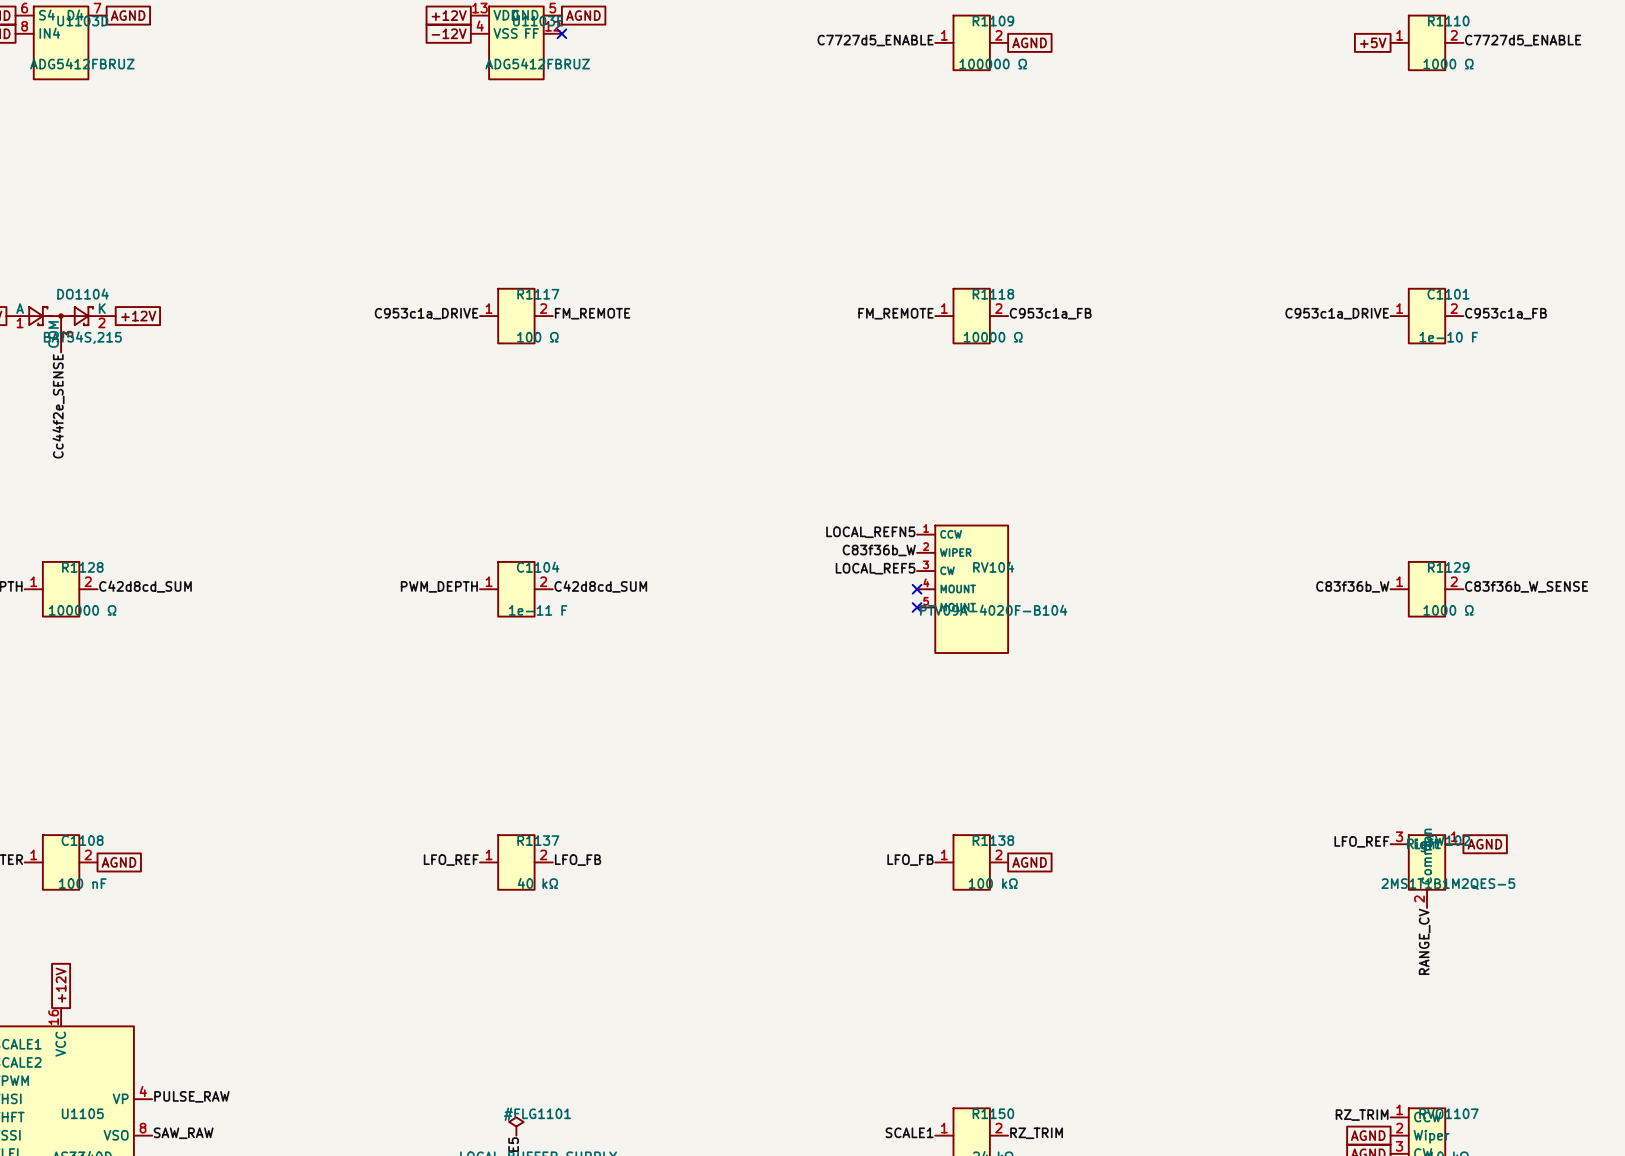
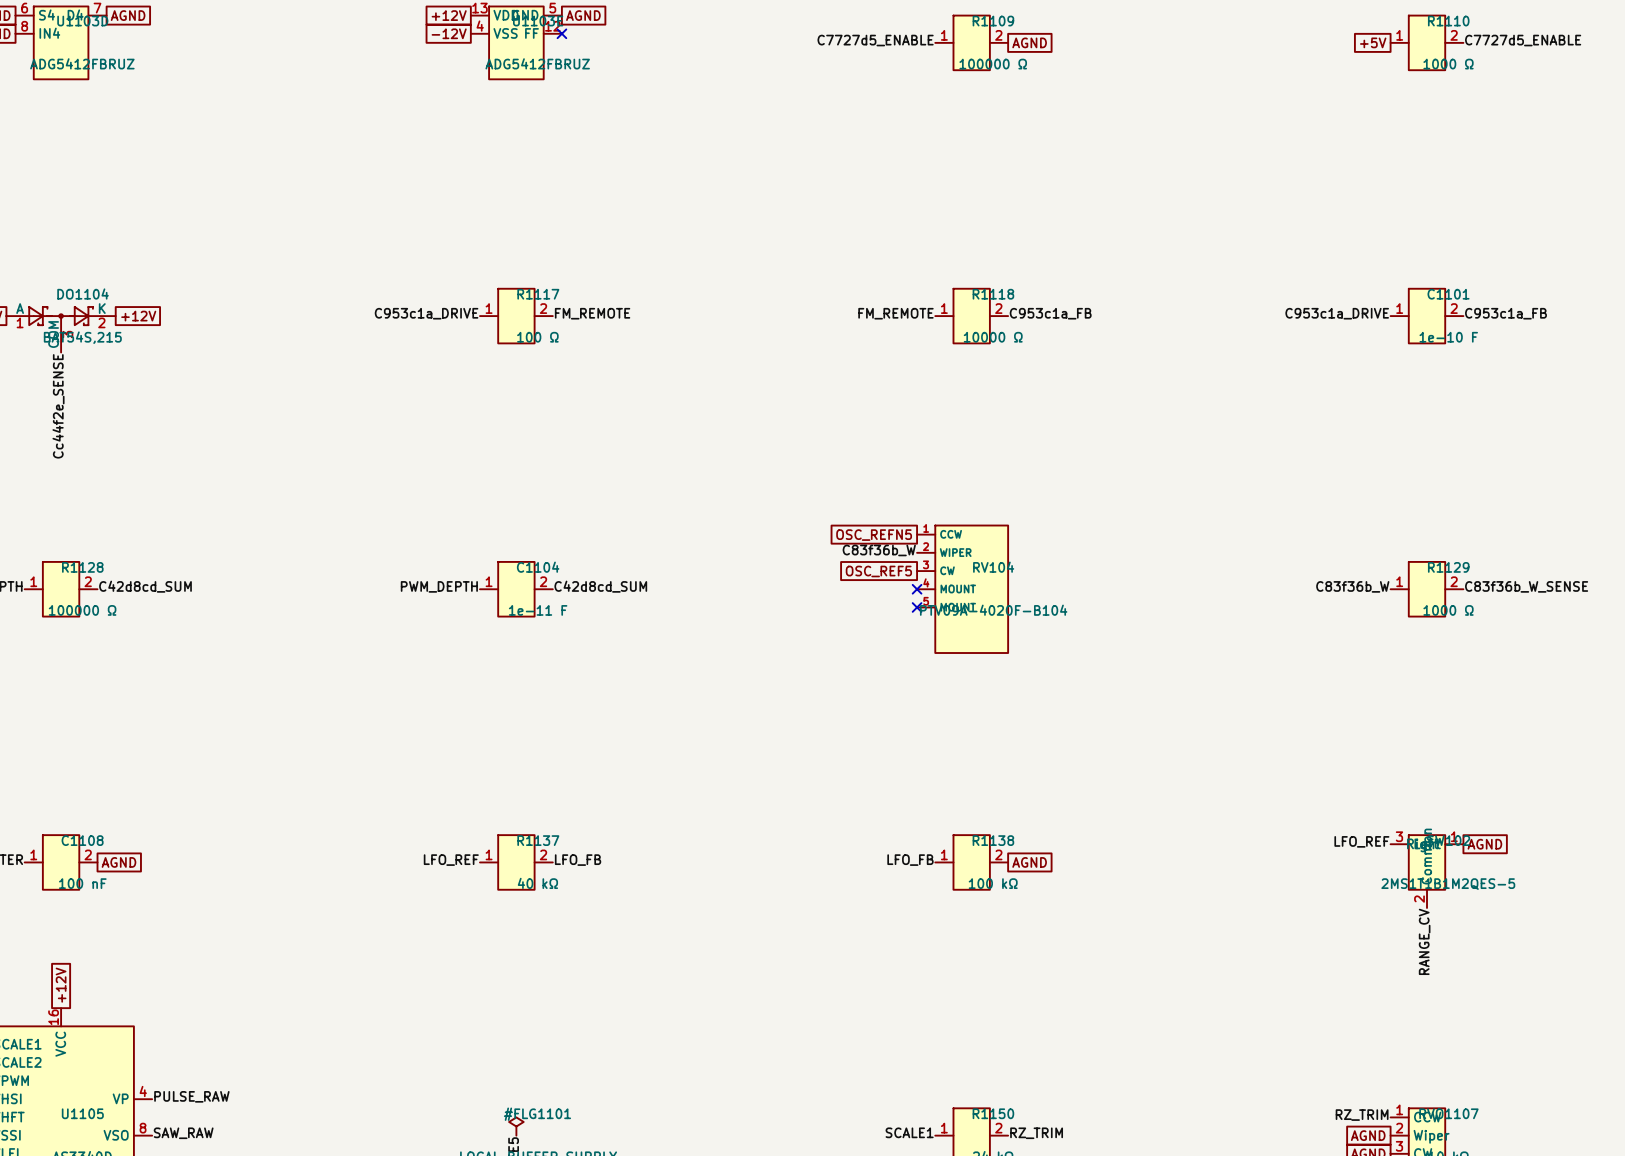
label: LOCAL_REFN5 (870, 532) -> none
global label: none -> OSC_REFN5 (874, 535)
label: LOCAL_REF5 (875, 568) -> none
global label: none -> OSC_REF5 (878, 571)

